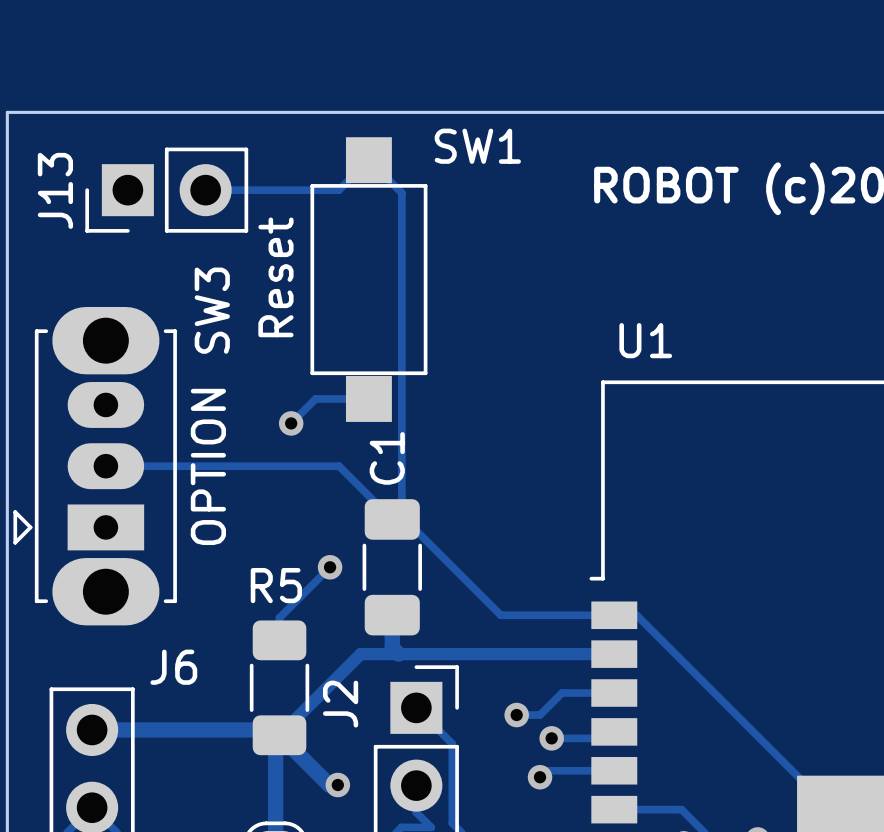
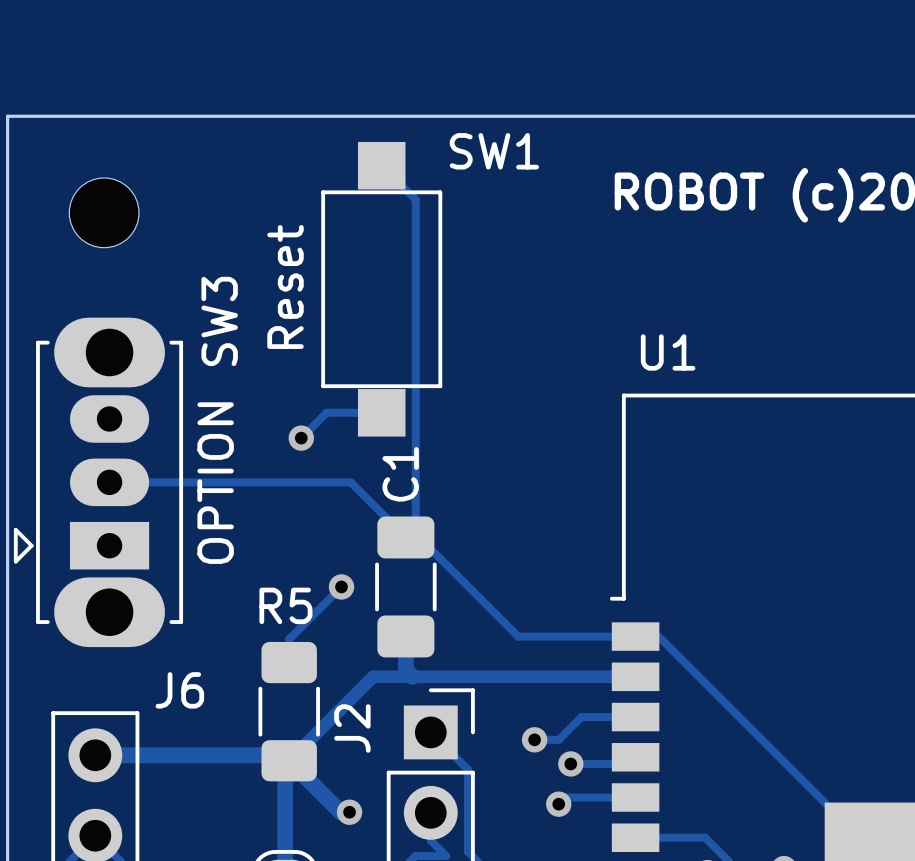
track: (368, 160) (338, 190) (205, 190) -> none
J13: (166, 190) -> none
part: none -> (104, 212)

